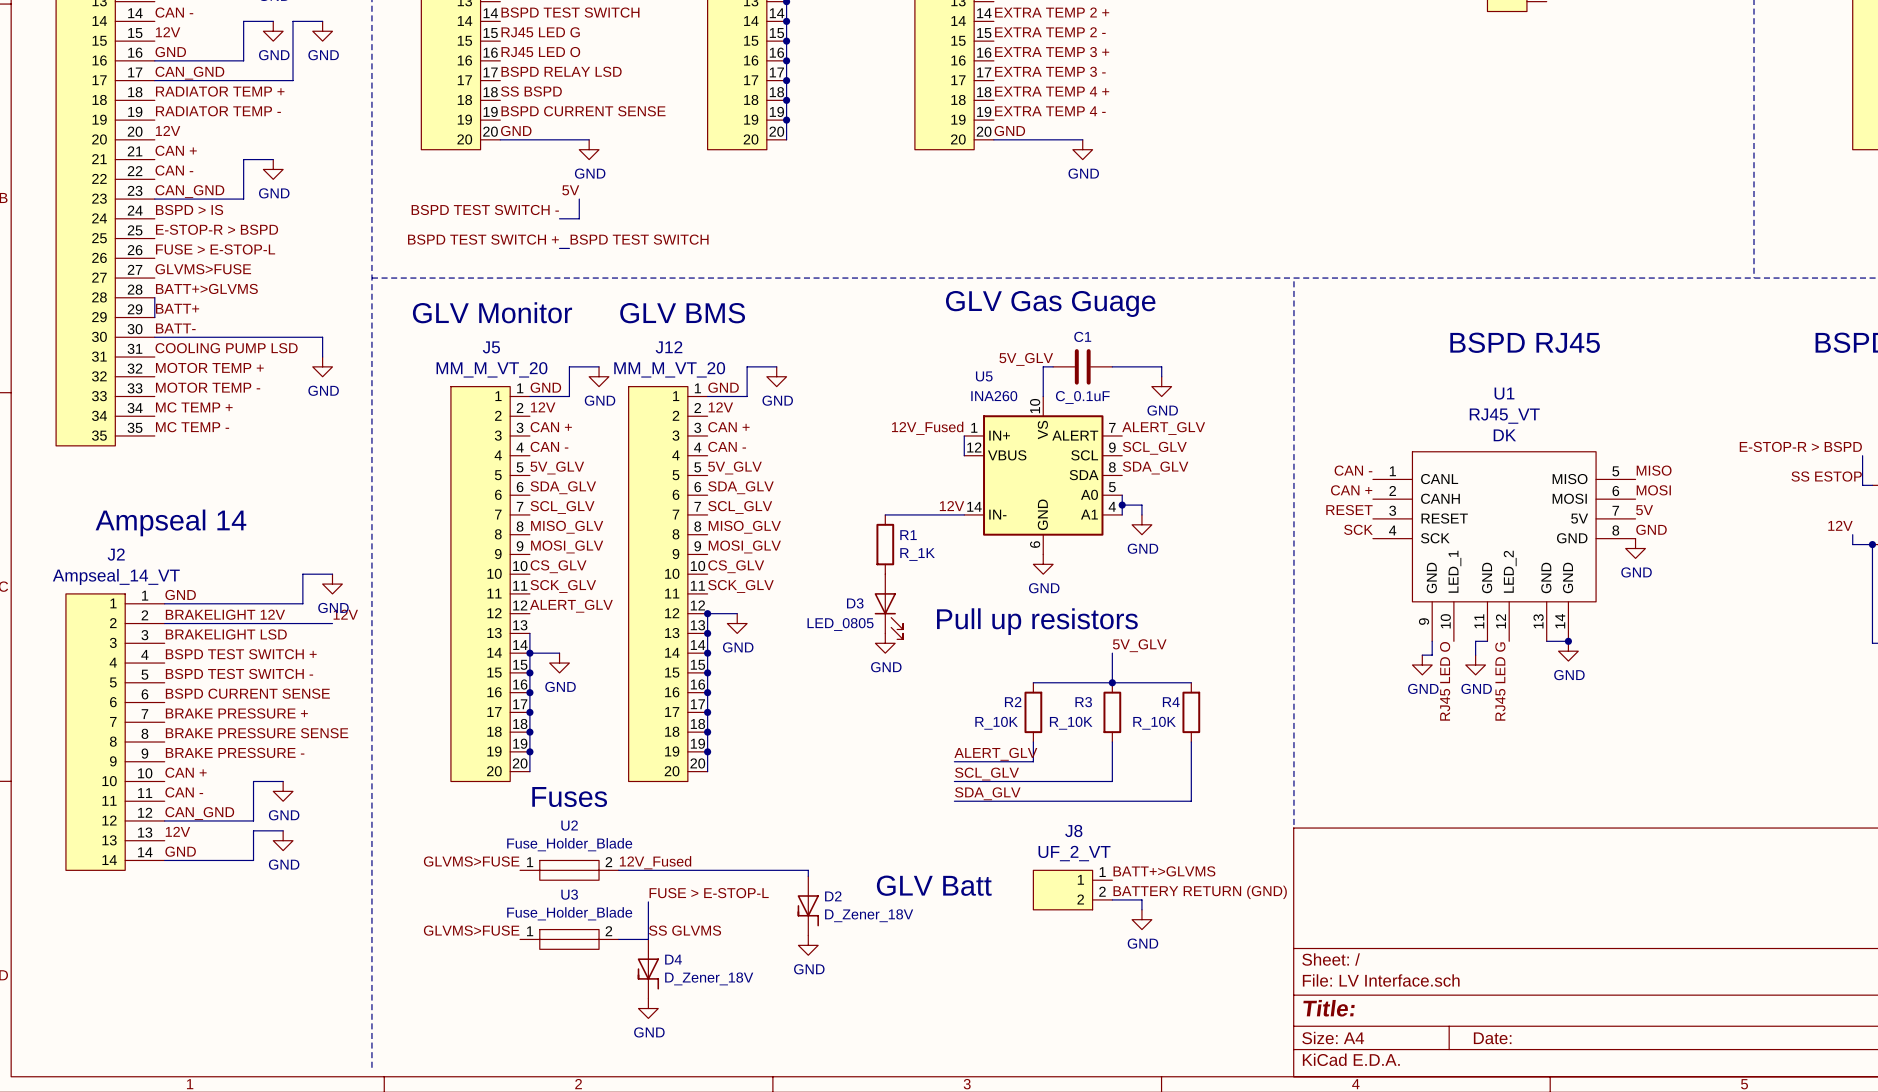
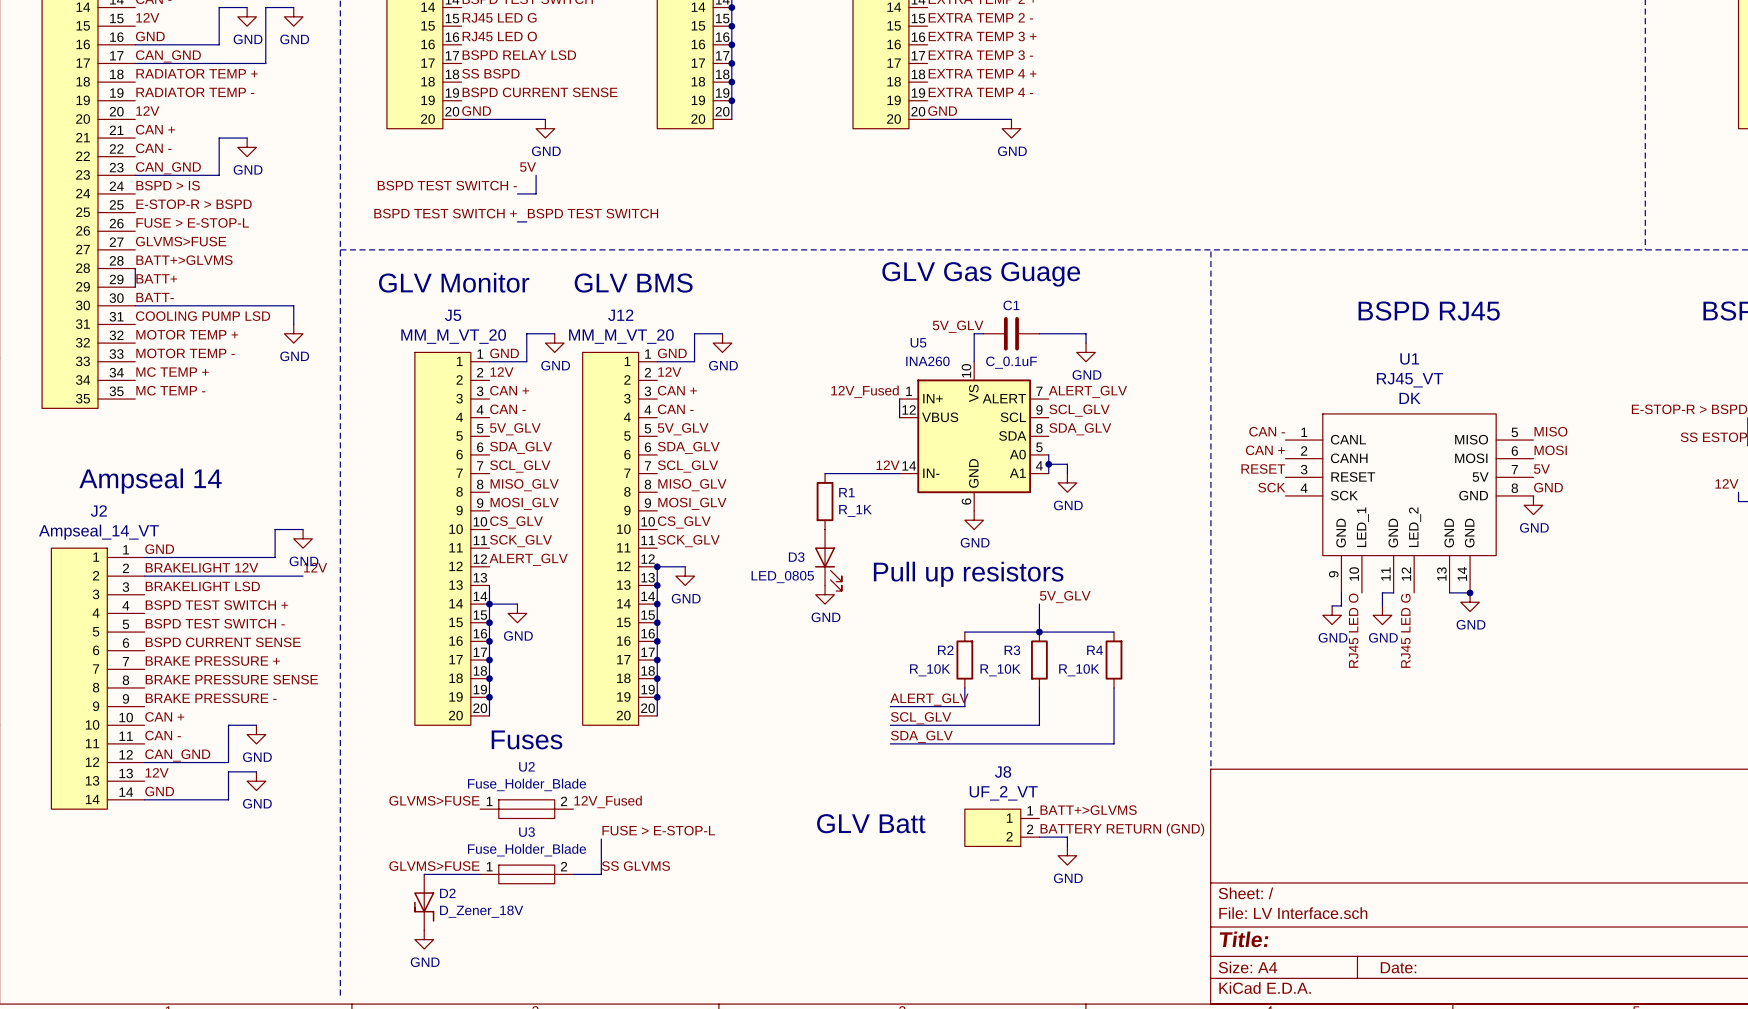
wire: (618, 870) (808, 870) (808, 876) -> none
D2 position: (808, 905) -> (424, 902)
wire: none -> (424, 874) (480, 874)
power symbol: GND (808, 945) -> none
D4: D_Zener_18V (648, 969) -> none
power symbol: none -> GND (424, 939)
power symbol: GND (648, 1008) -> none

